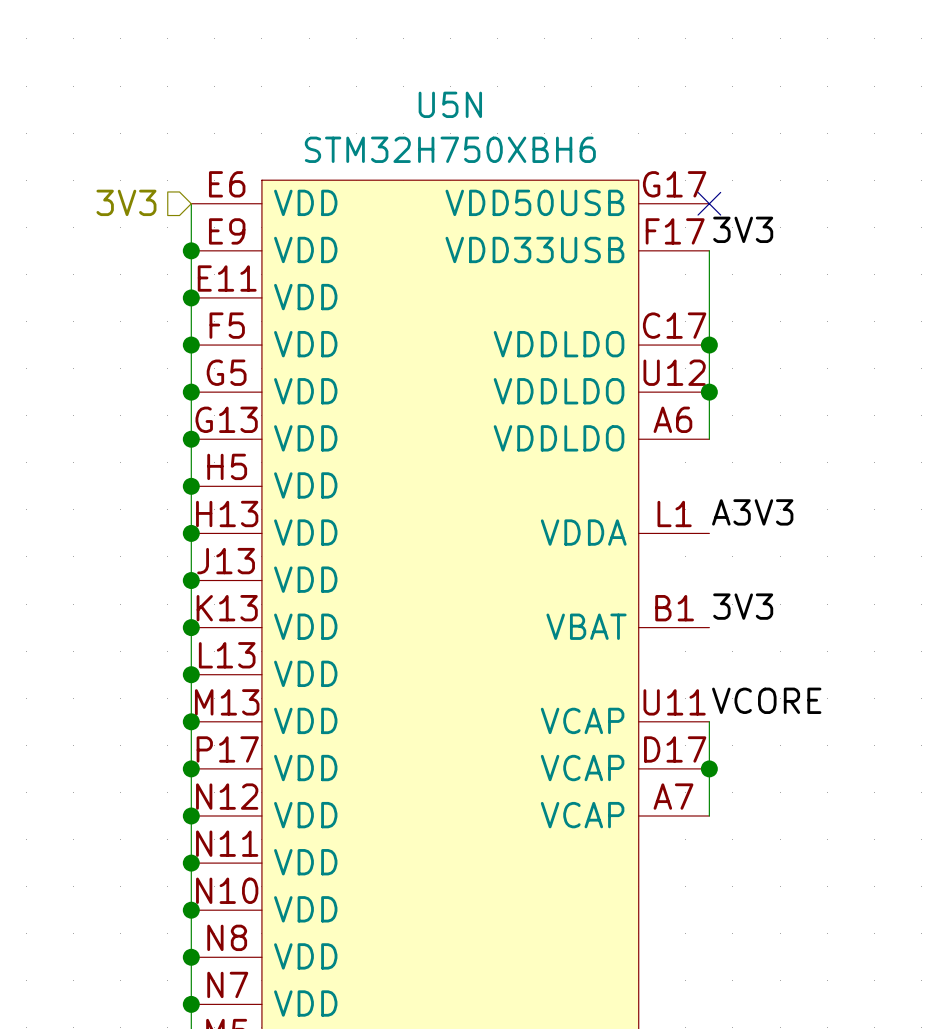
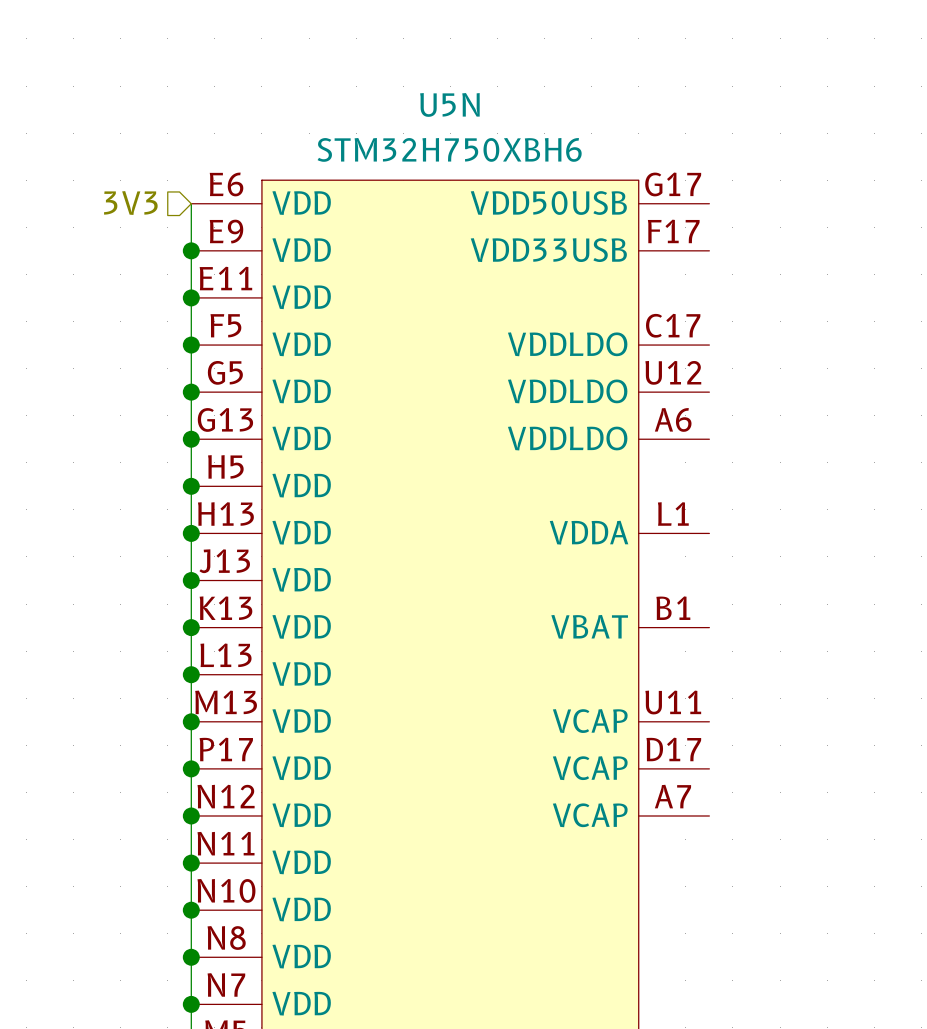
no-connect mark: (709, 203) -> none
label: 3V3 (743, 229) -> none
wire: (709, 250) (709, 439) -> none
junction: (709, 345) -> none
junction: (709, 392) -> none
label: A3V3 (752, 512) -> none
label: 3V3 (743, 606) -> none
label: VCORE (766, 700) -> none
wire: (709, 721) (709, 816) -> none
junction: (709, 768) -> none

